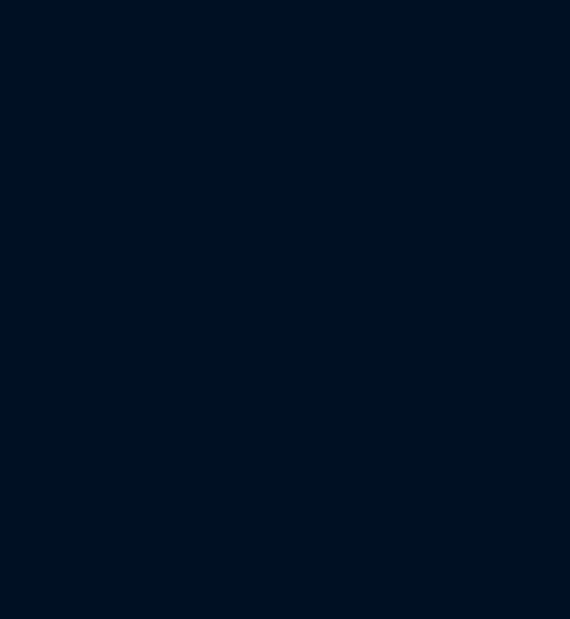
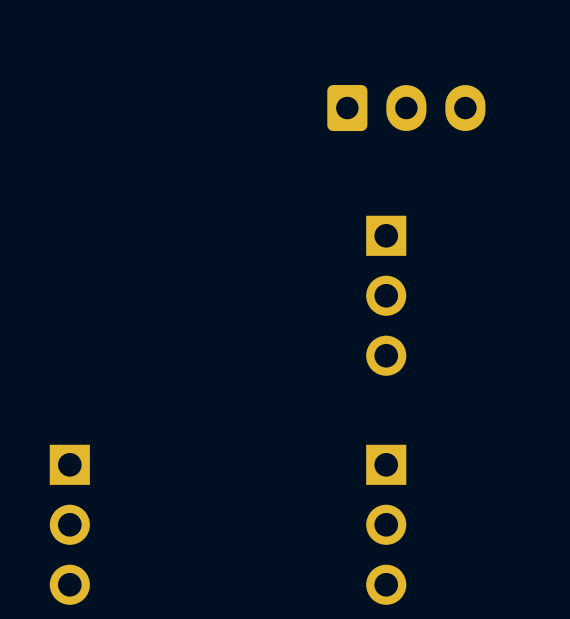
part: none -> (406, 108)
part: none -> (386, 295)
part: none -> (69, 524)
part: none -> (386, 524)

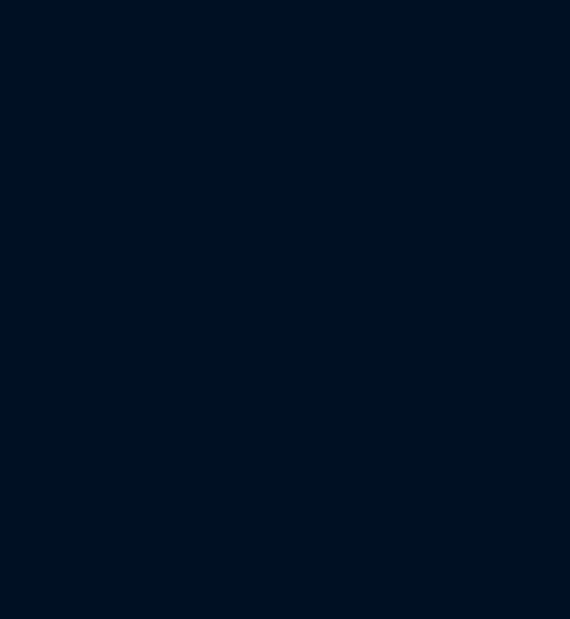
part: (406, 108) -> none
part: (386, 295) -> none
part: (69, 524) -> none
part: (386, 524) -> none

